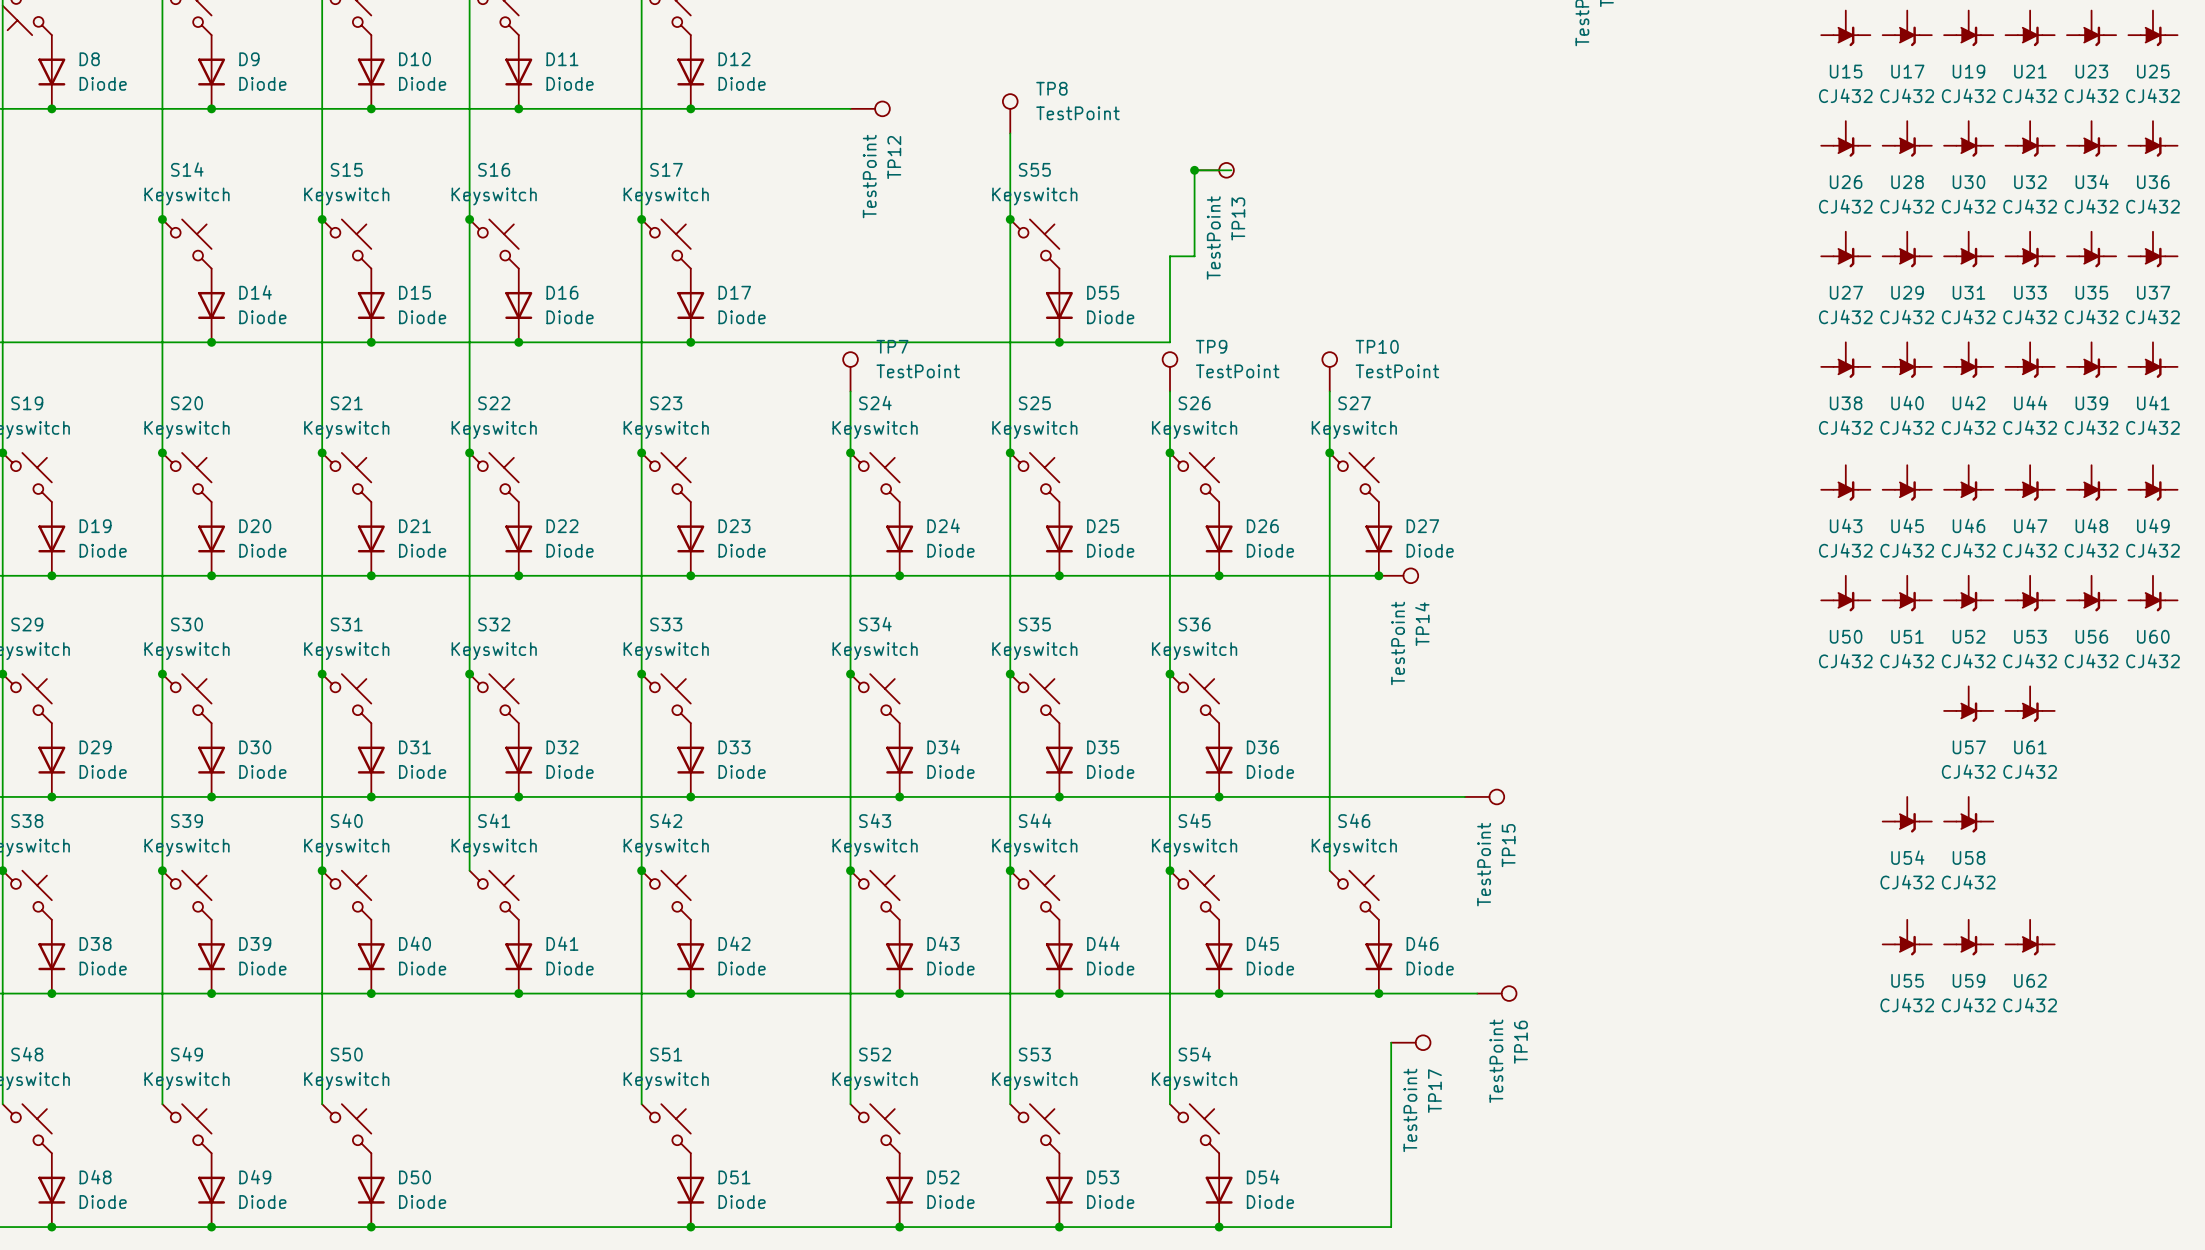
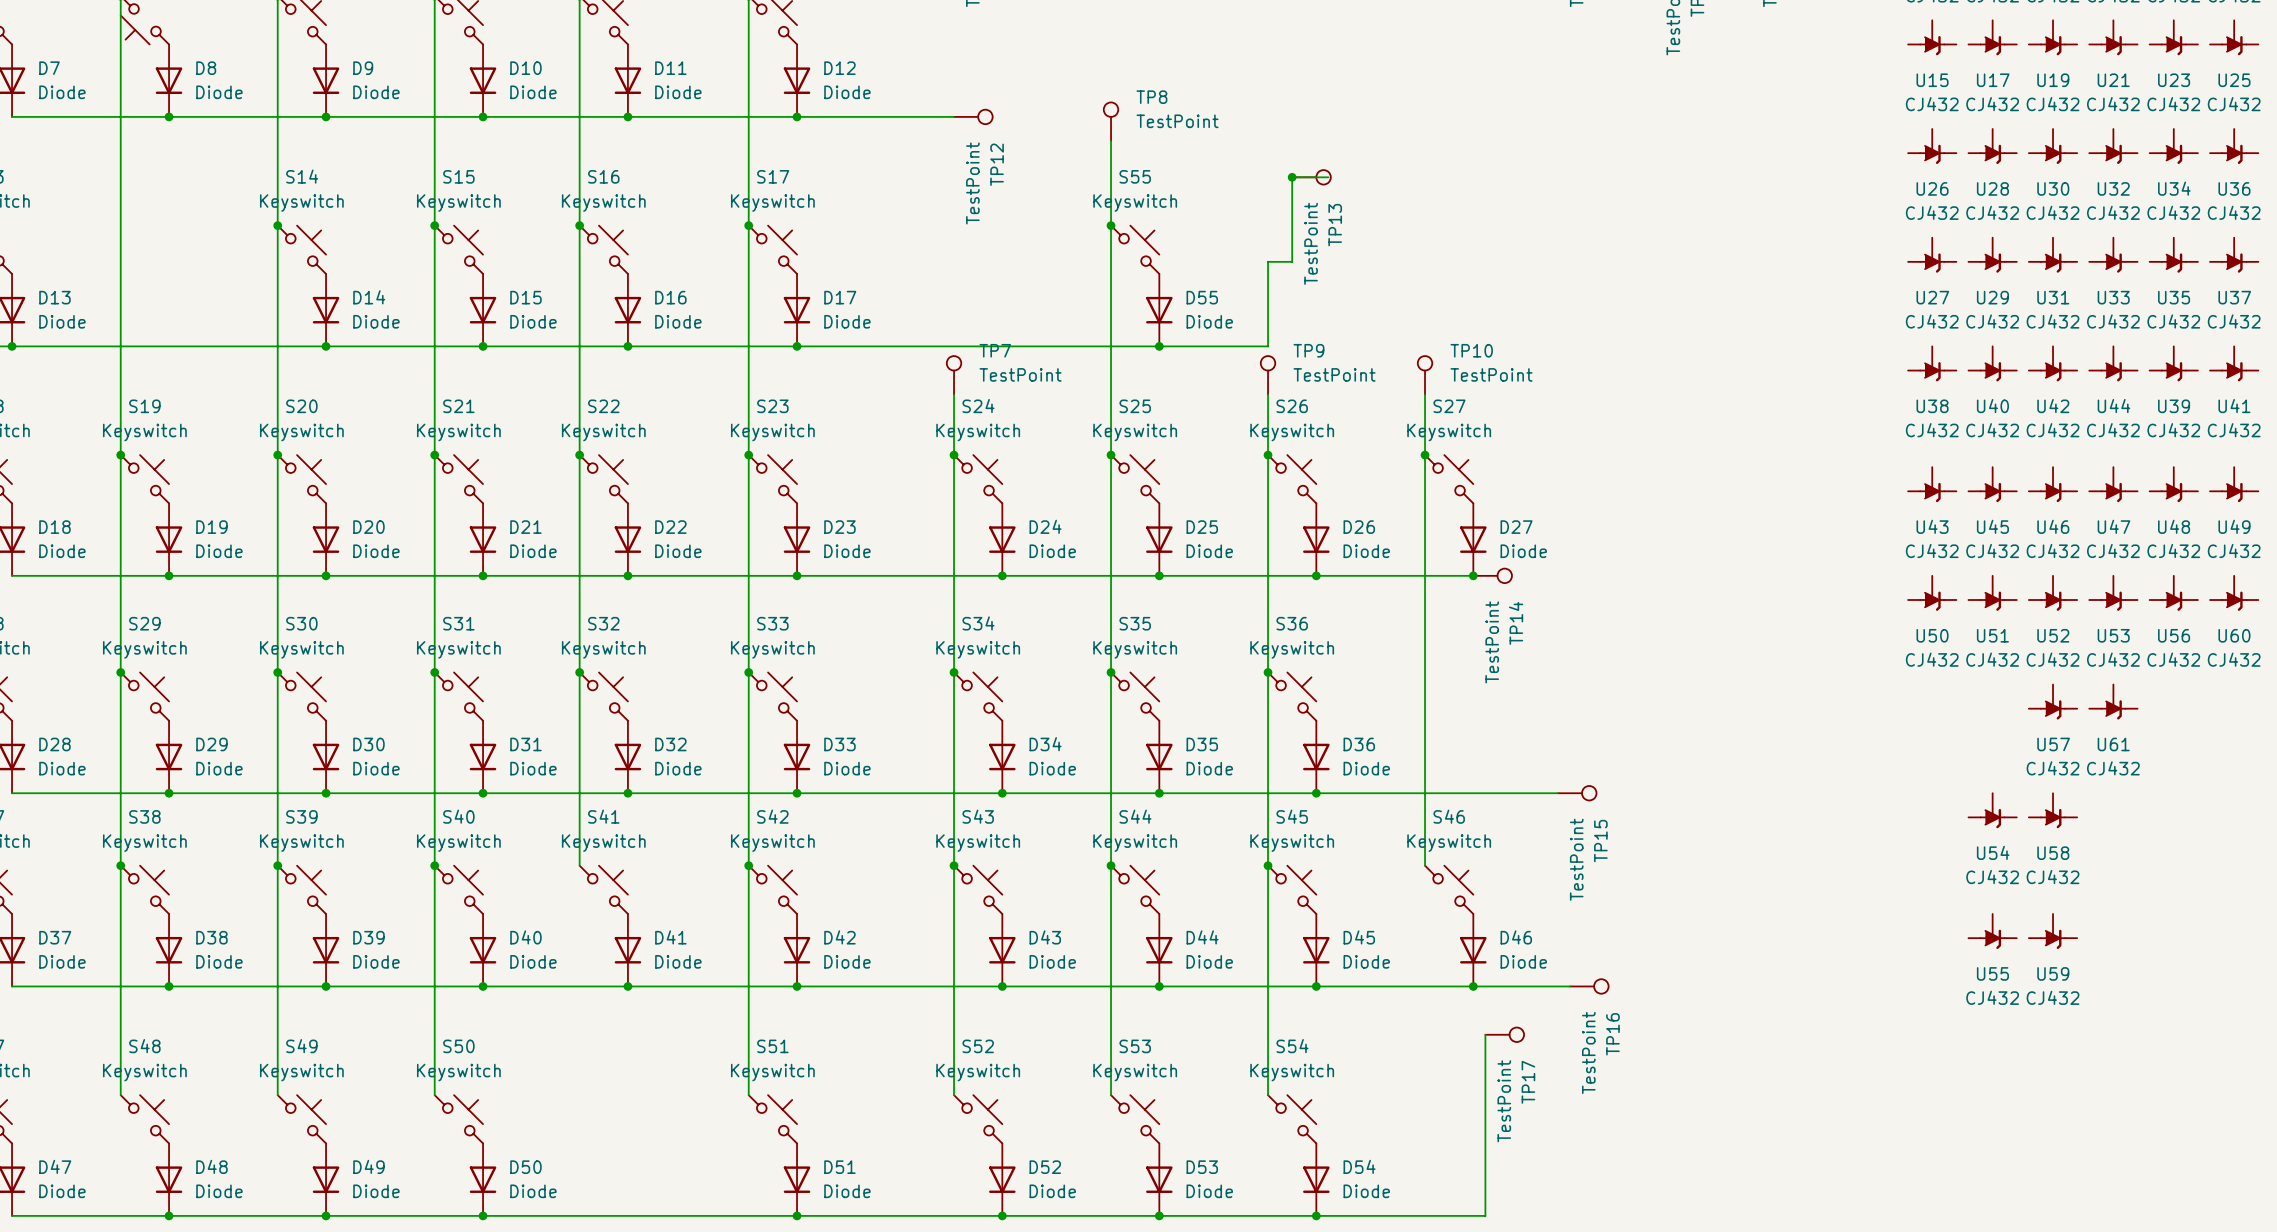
U62: CJ432 (2030, 937) -> none

